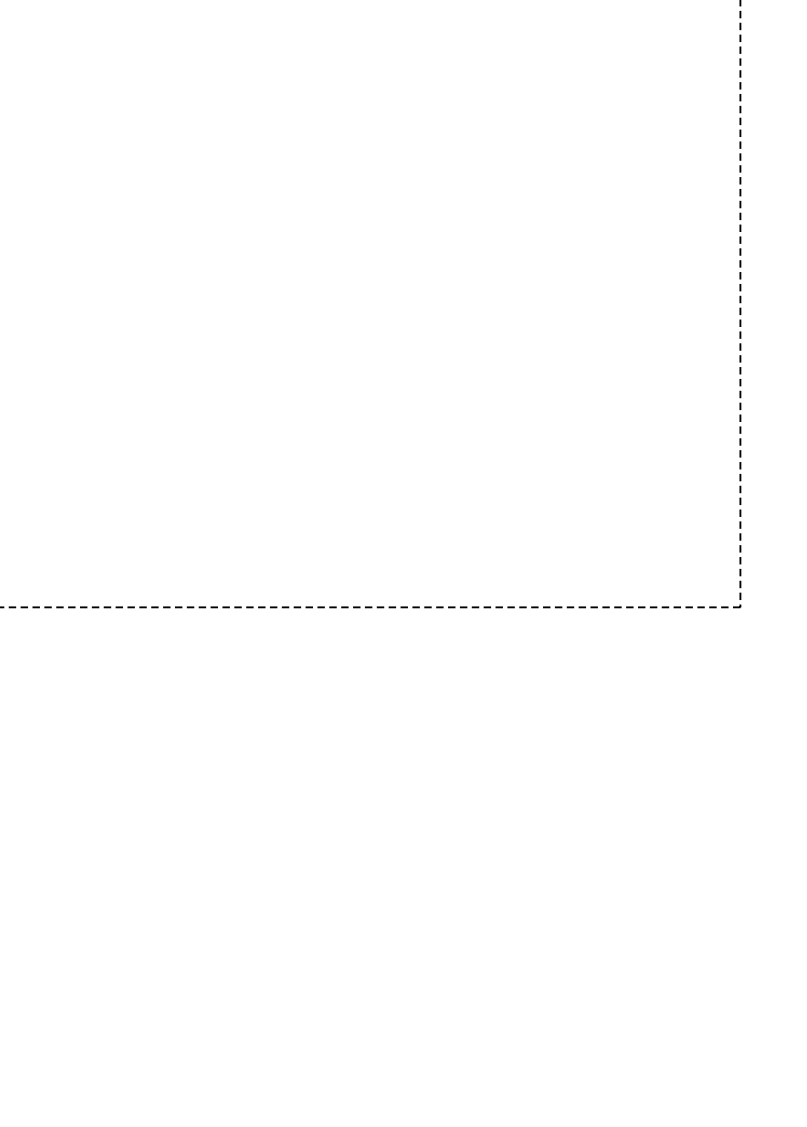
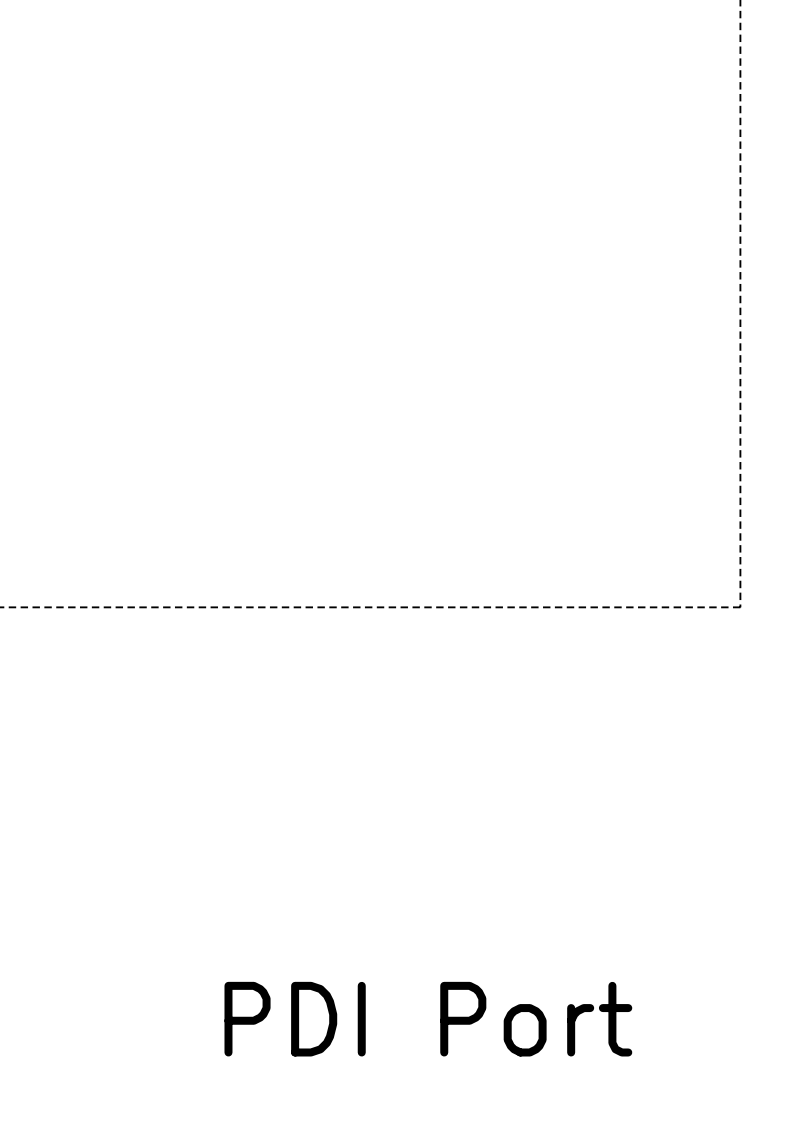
text: none -> PDI Port (428, 1019)

